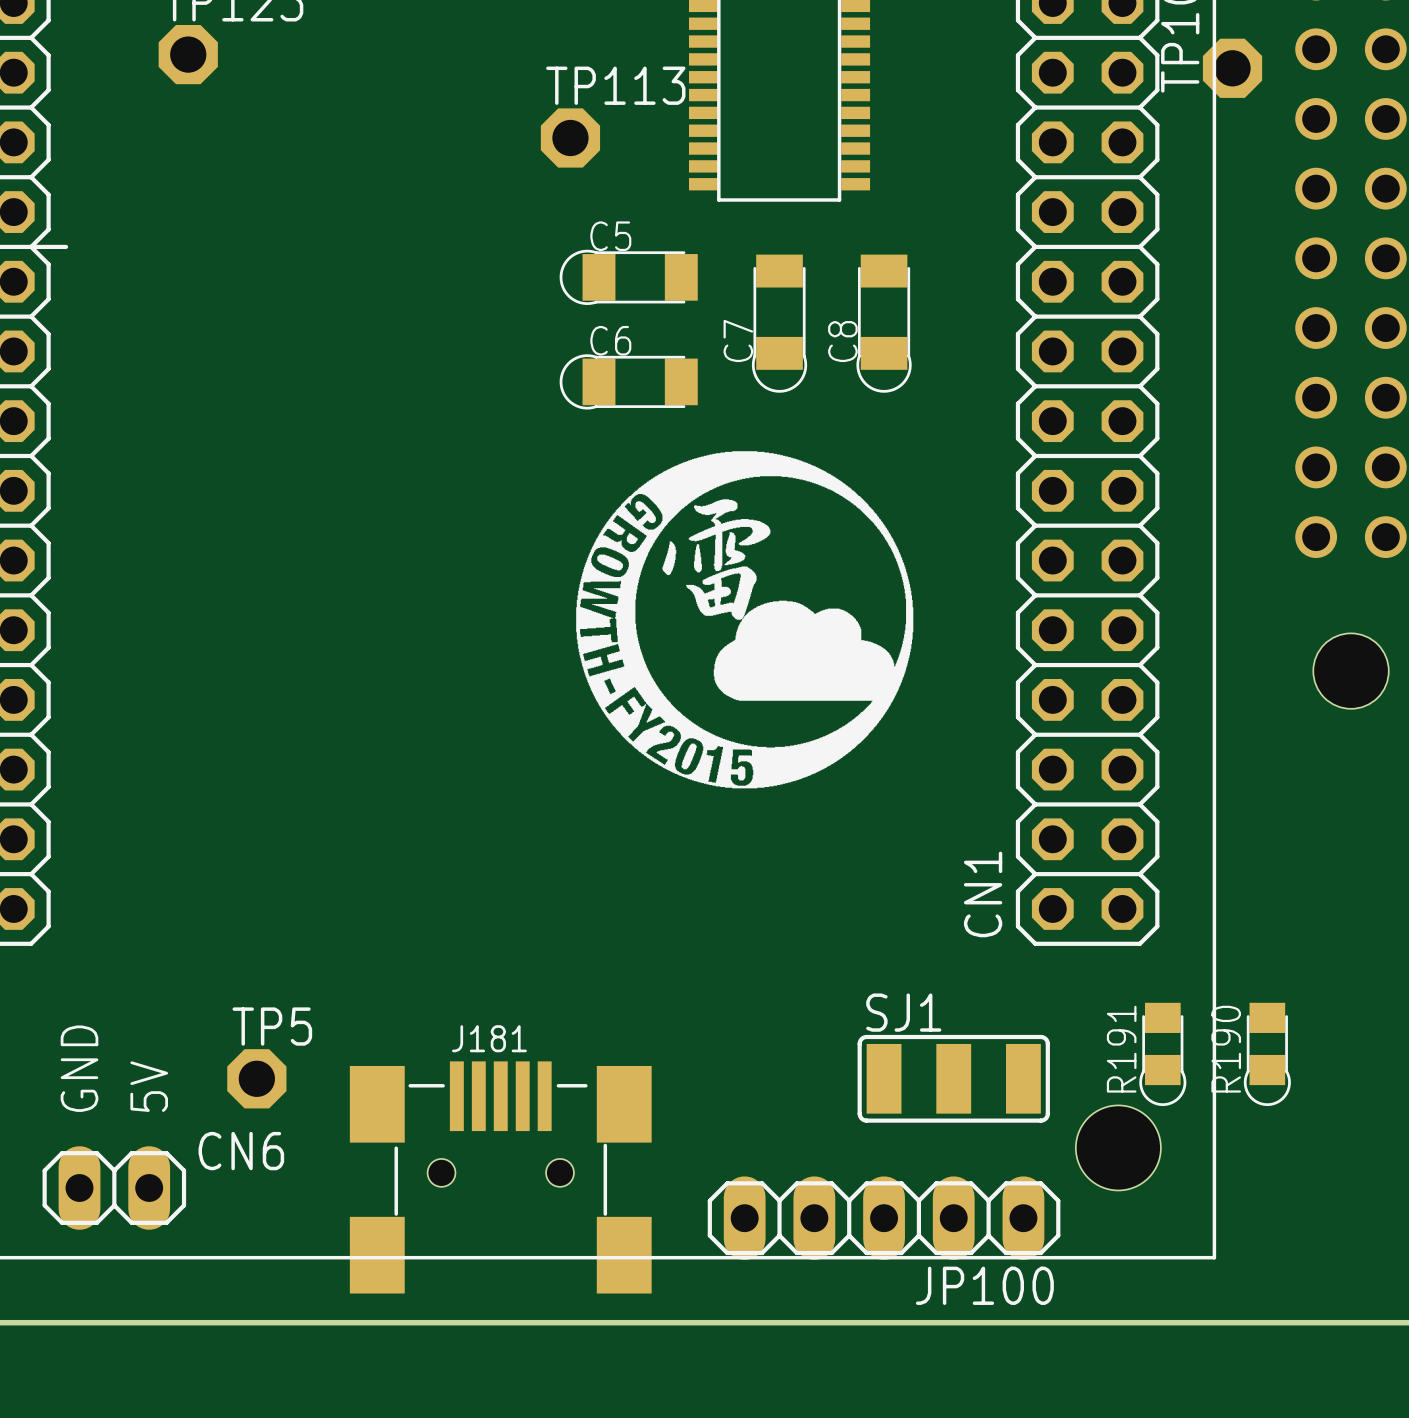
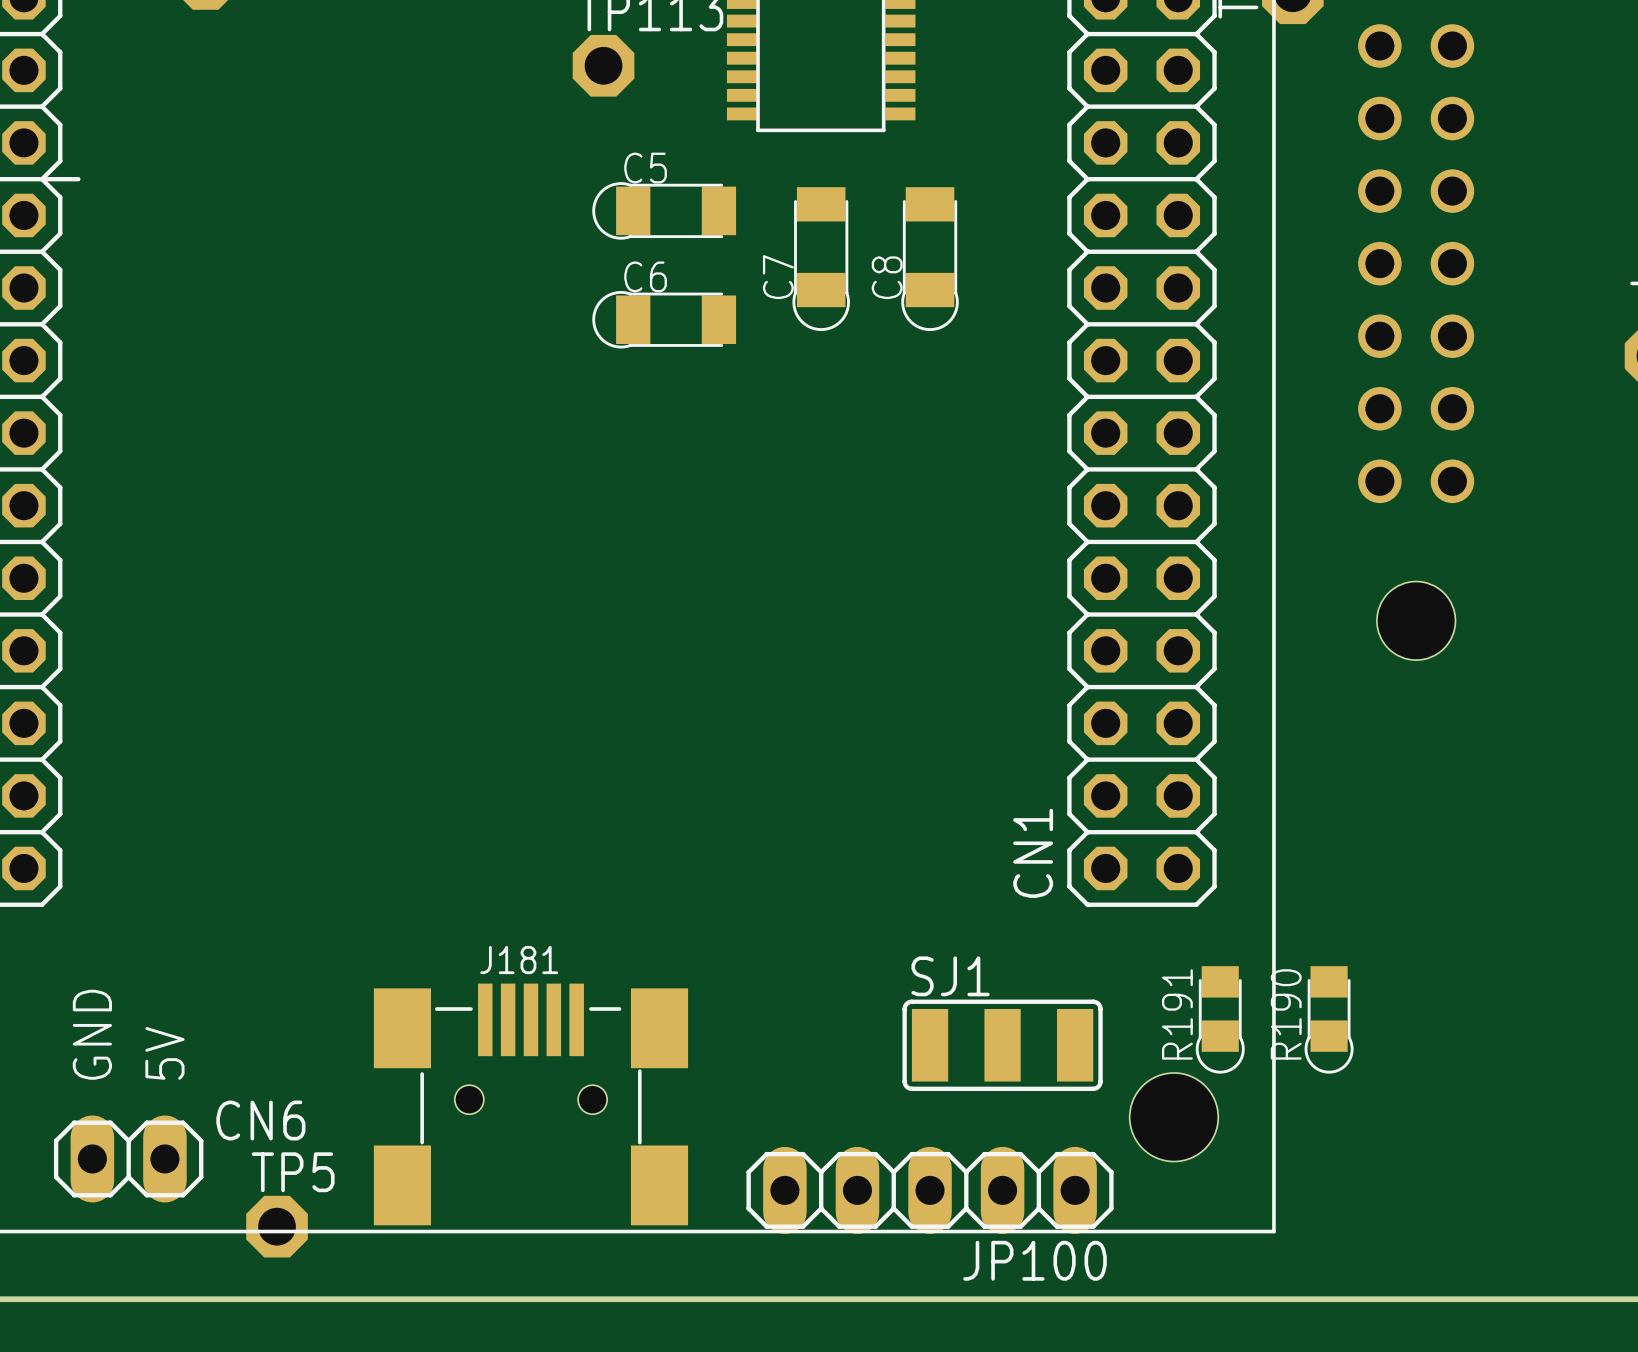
drawing: [576, 451, 914, 789] -> none
TP5 position: (256, 1078) -> (277, 1226)
J181 position: (500, 1177) -> (530, 1104)

